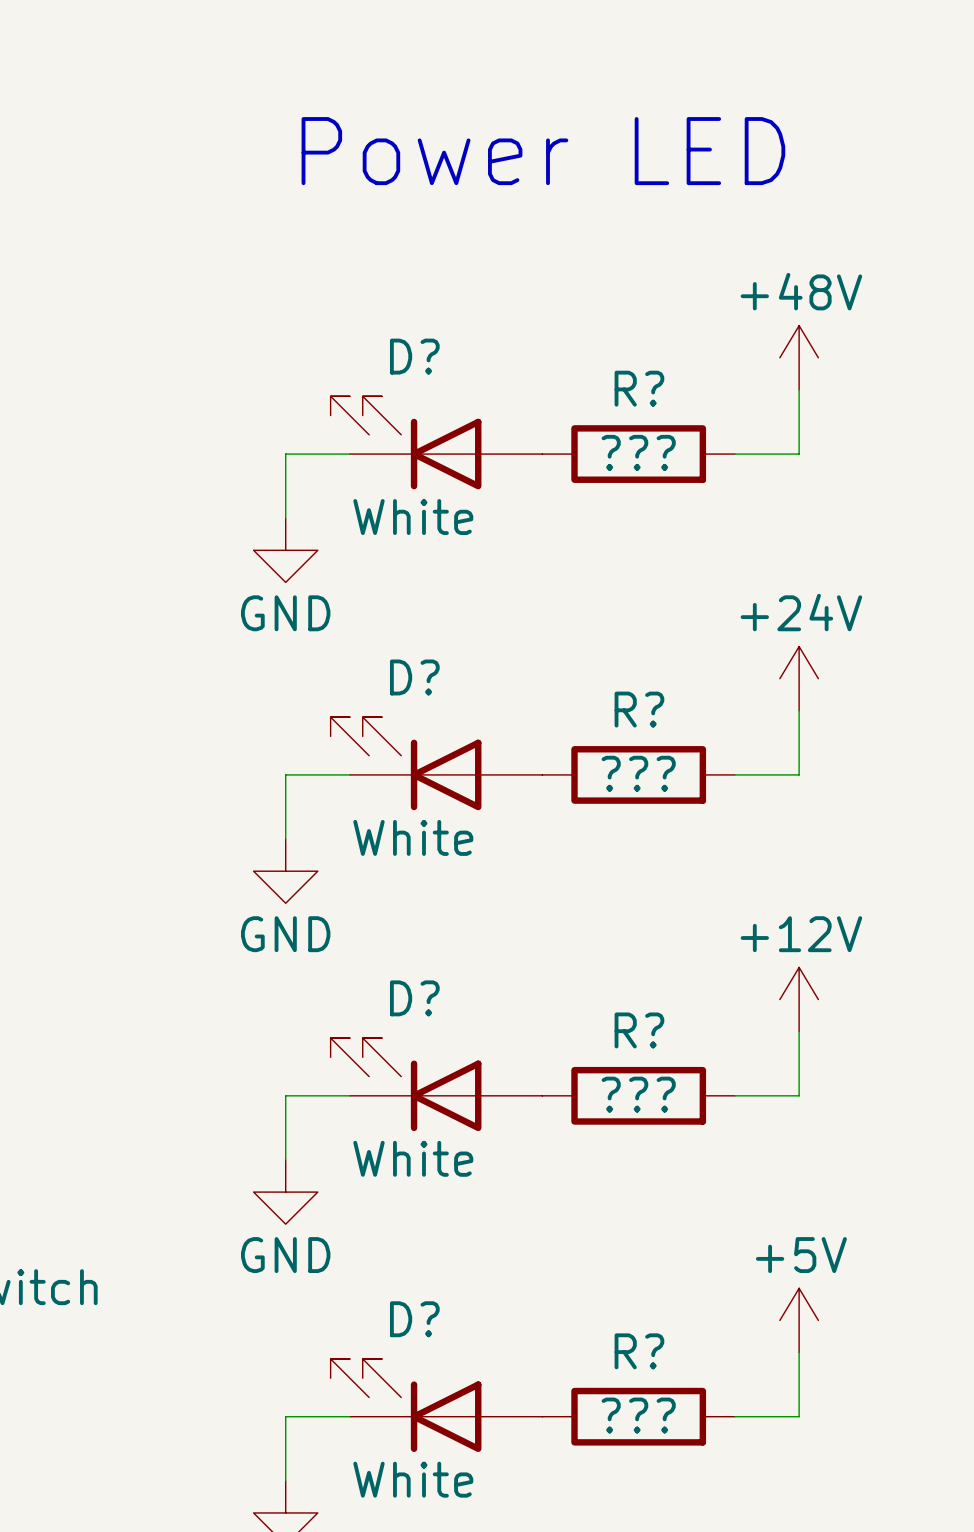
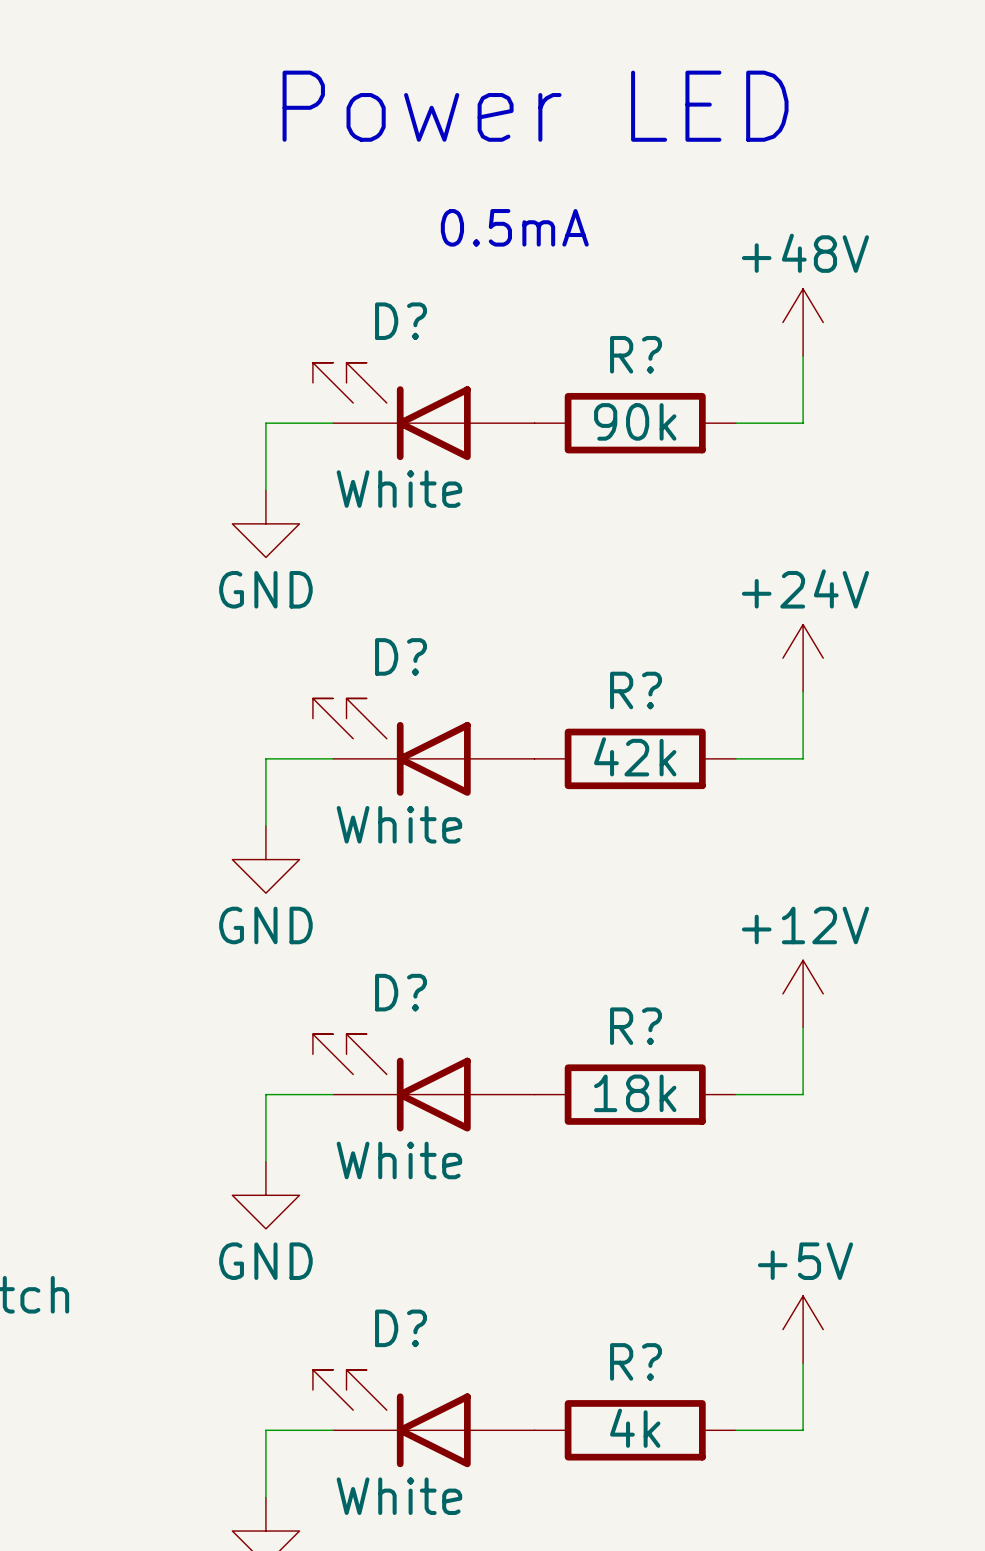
text: none -> 0.5mA (514, 227)
R? value: ??? (638, 452) -> 90k (635, 421)
R? value: ??? (638, 773) -> 42k (635, 756)
R? value: ??? (638, 1094) -> 18k (635, 1093)
R? value: ??? (638, 1415) -> 4k (635, 1428)

